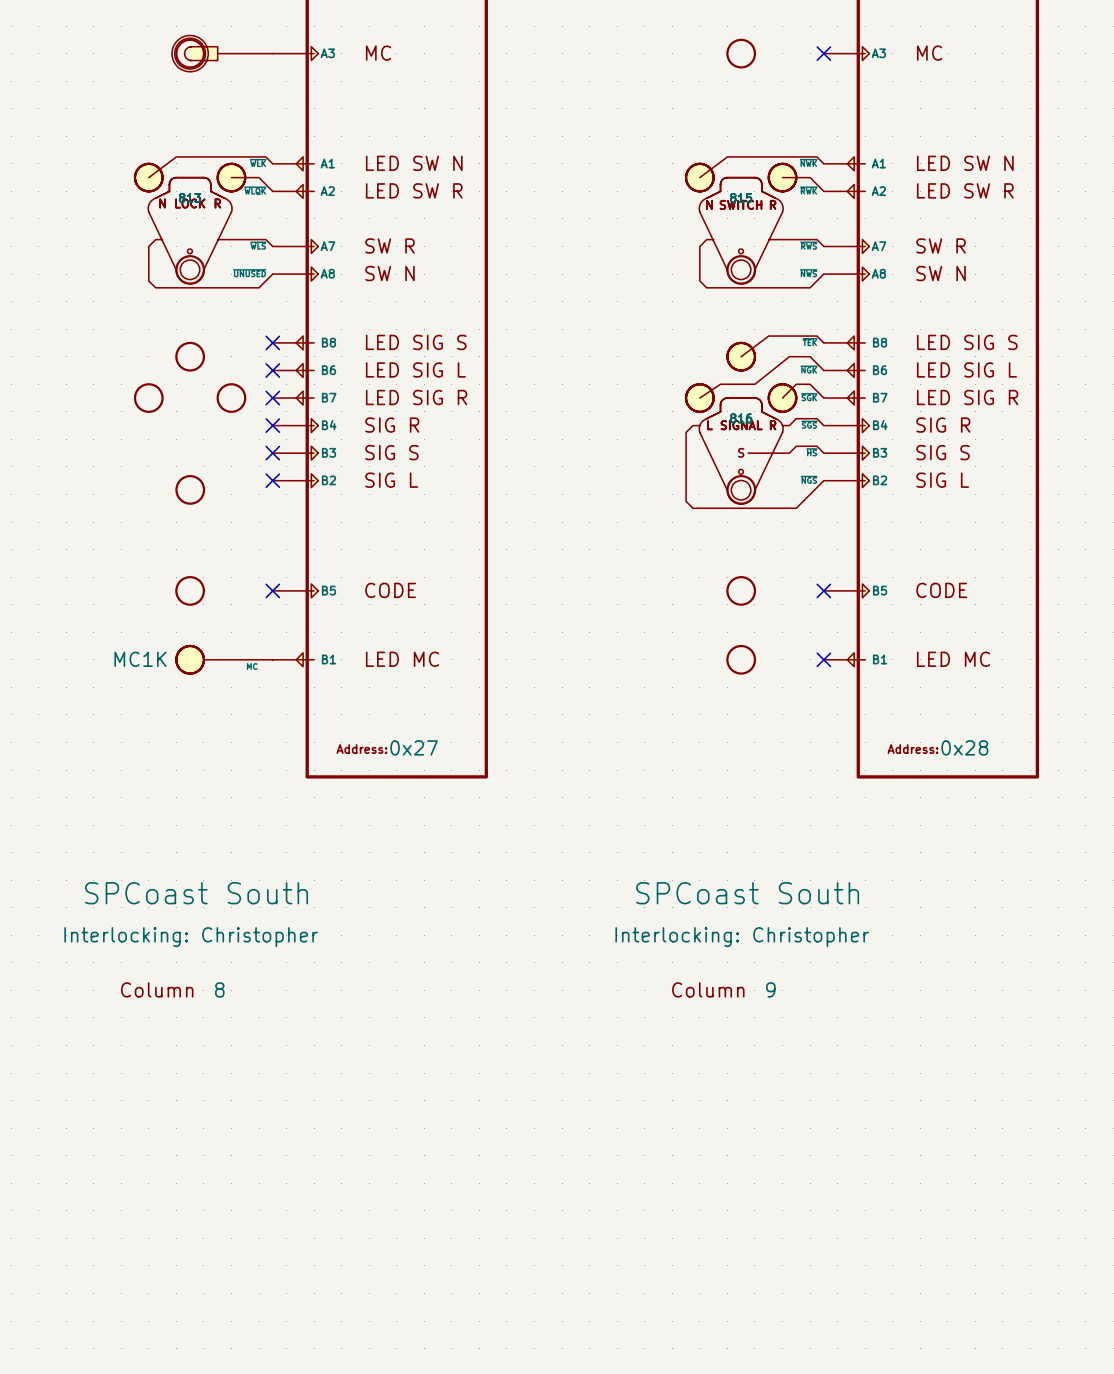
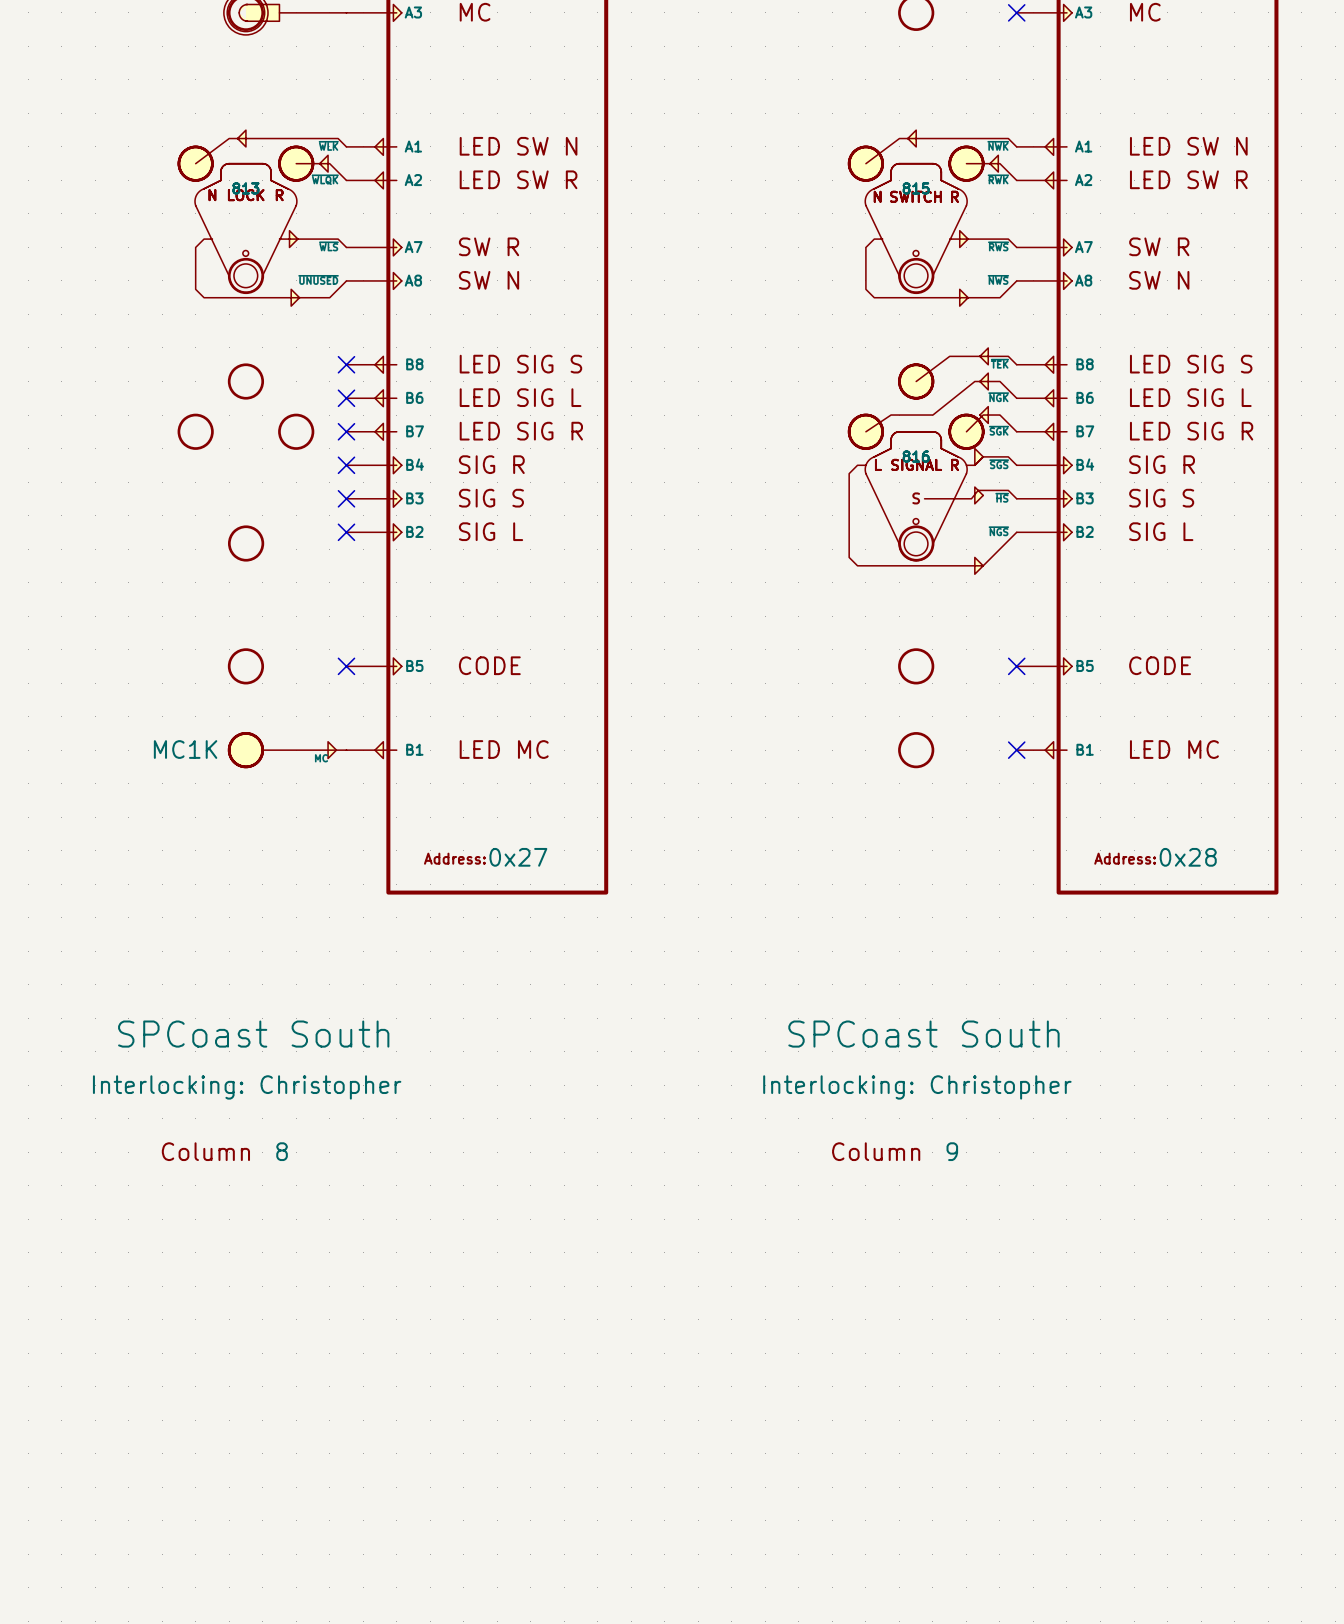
part symbol: [133, 156, 273, 199] -> [177, 130, 347, 189]
part symbol: [684, 156, 824, 199] -> [847, 130, 1017, 189]
part symbol: [148, 177, 273, 288] -> [195, 163, 347, 307]
part symbol: [699, 177, 824, 288] -> [865, 163, 1017, 307]
part symbol: [684, 336, 824, 419] -> [847, 347, 1017, 457]
part symbol: [686, 398, 824, 509] -> [849, 431, 1017, 575]
part symbol: [175, 644, 273, 675] -> [227, 732, 347, 769]

